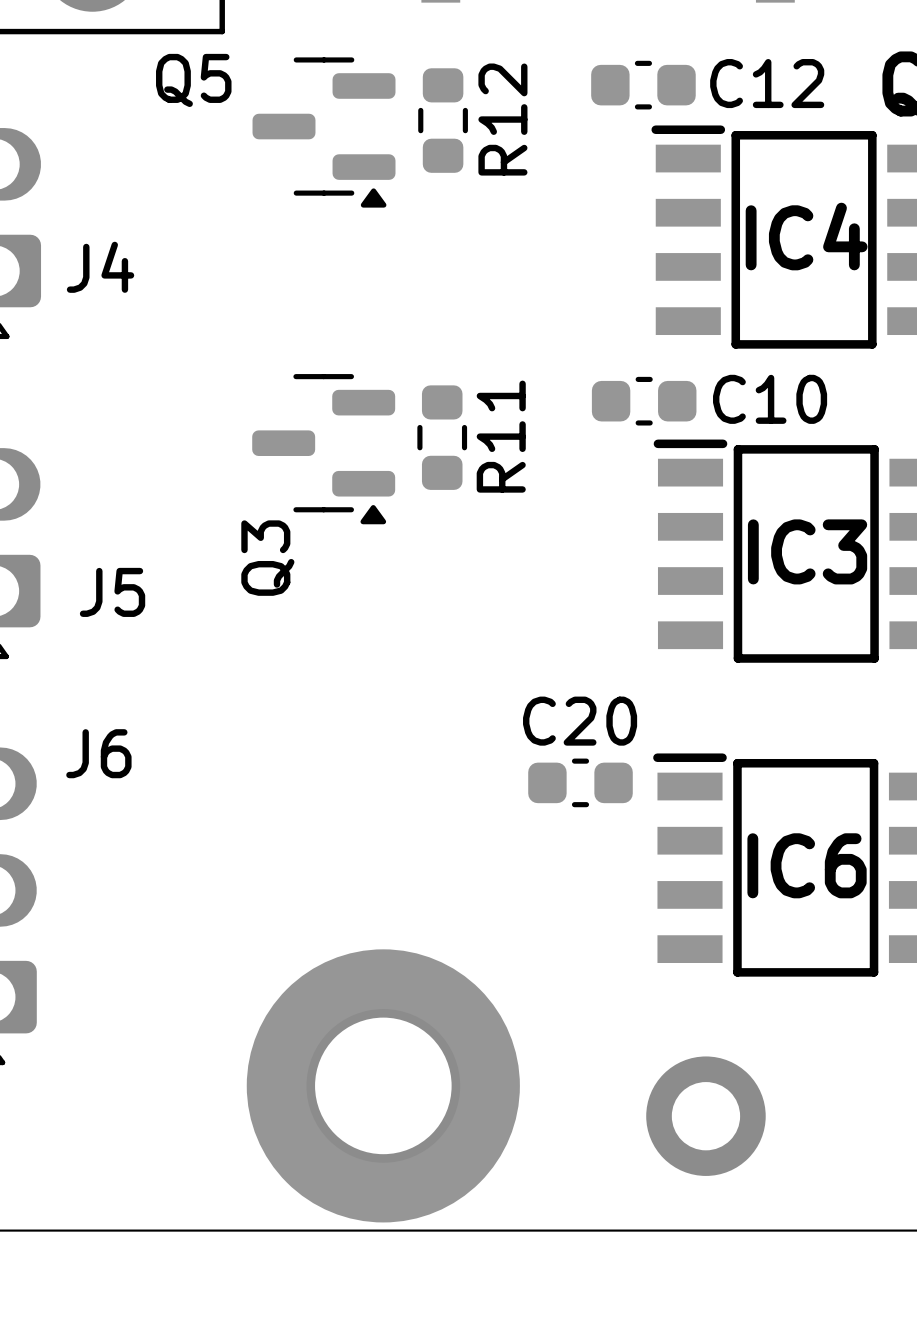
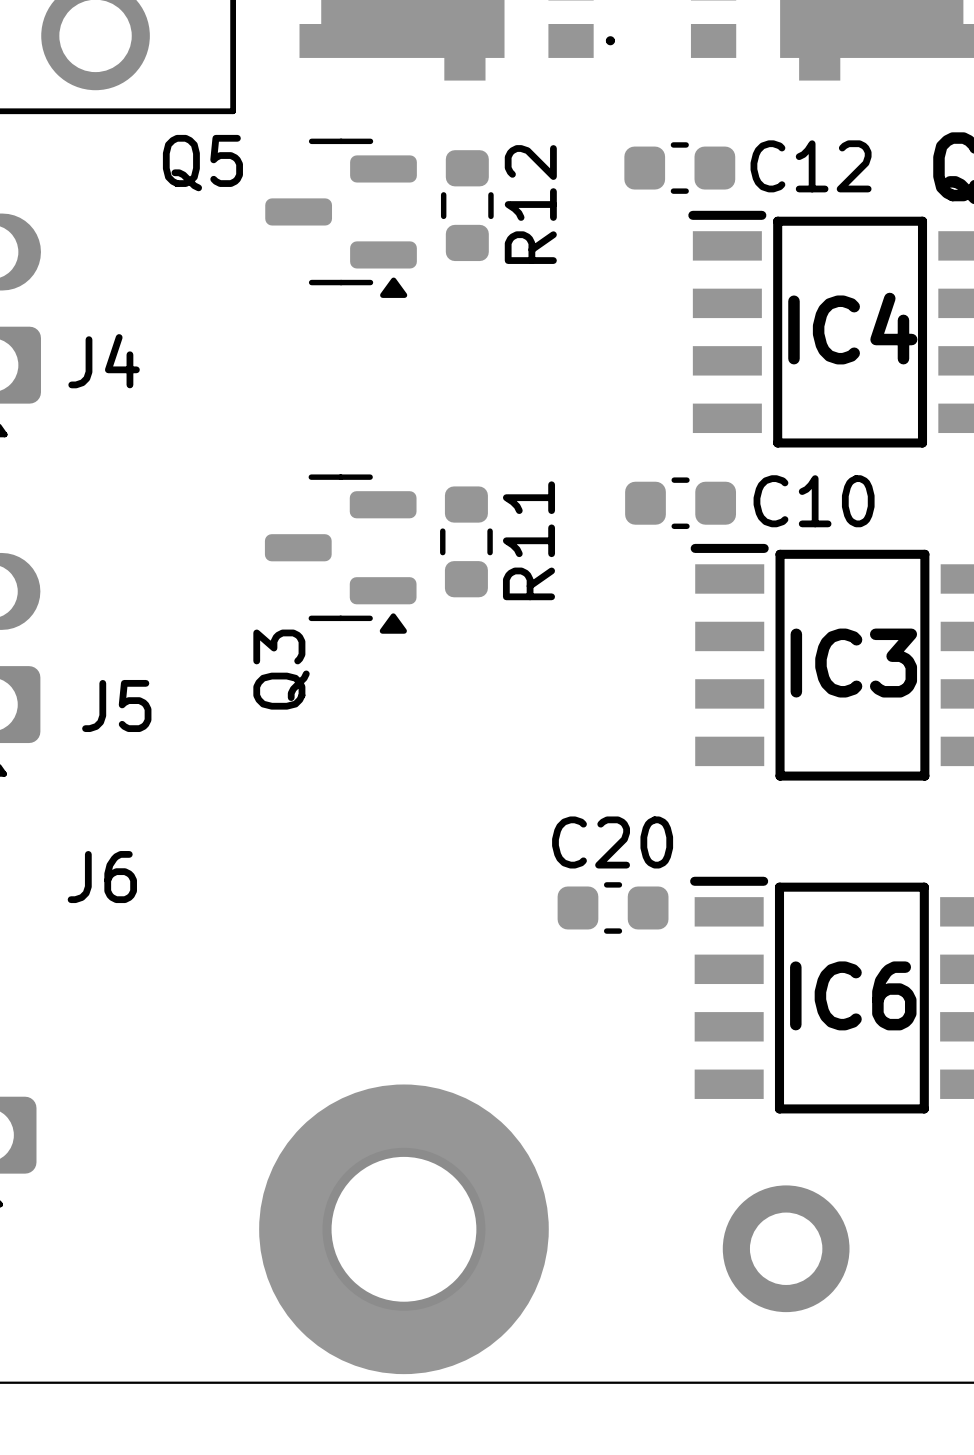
part position: (705, 1116) -> (786, 1248)

